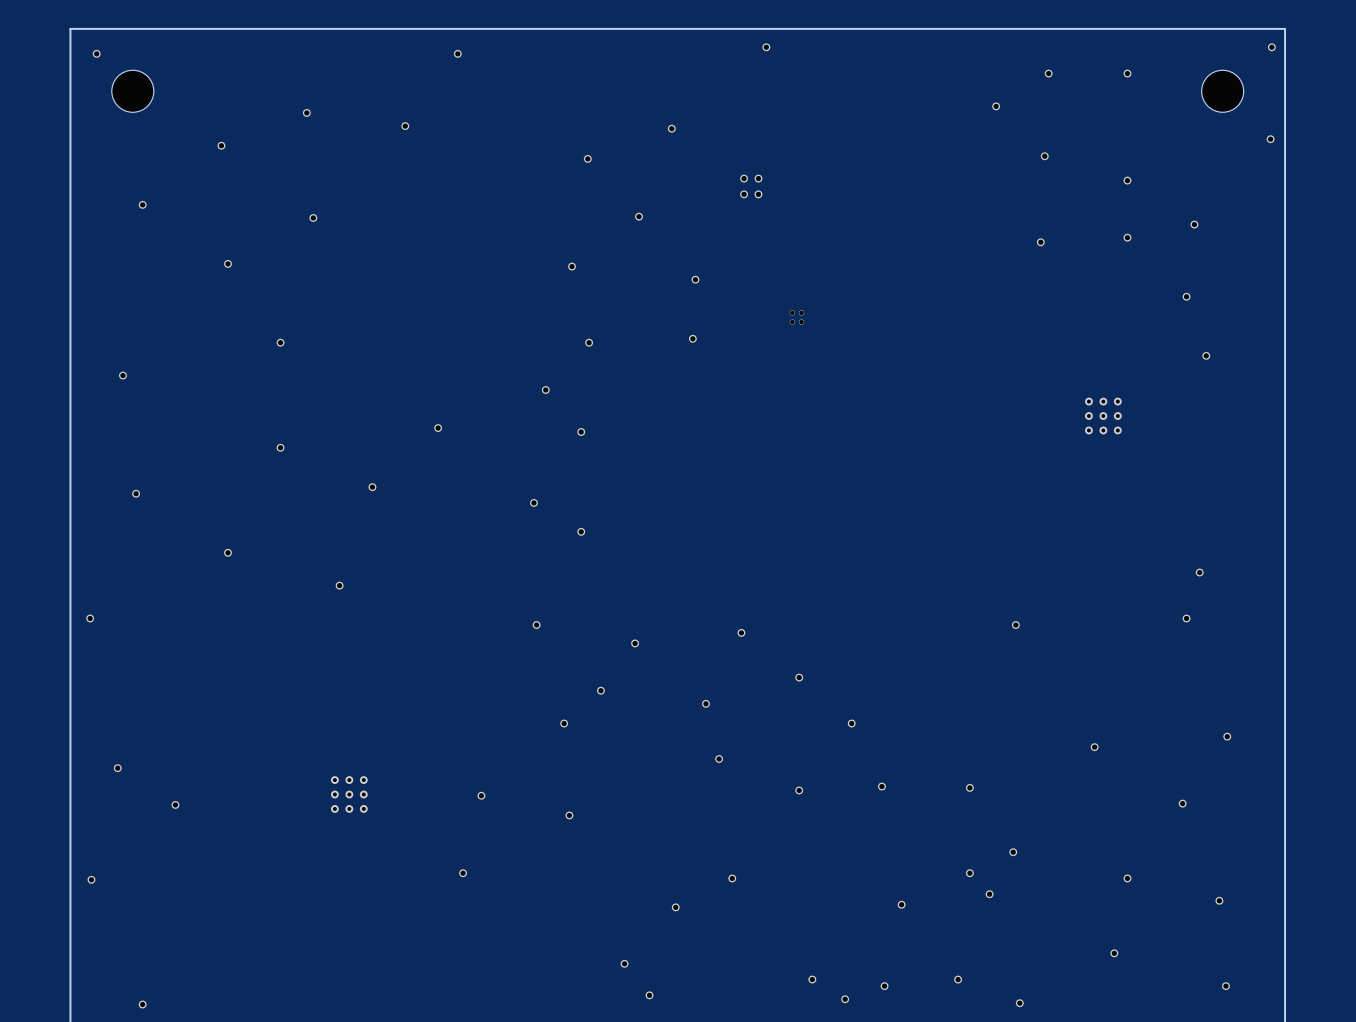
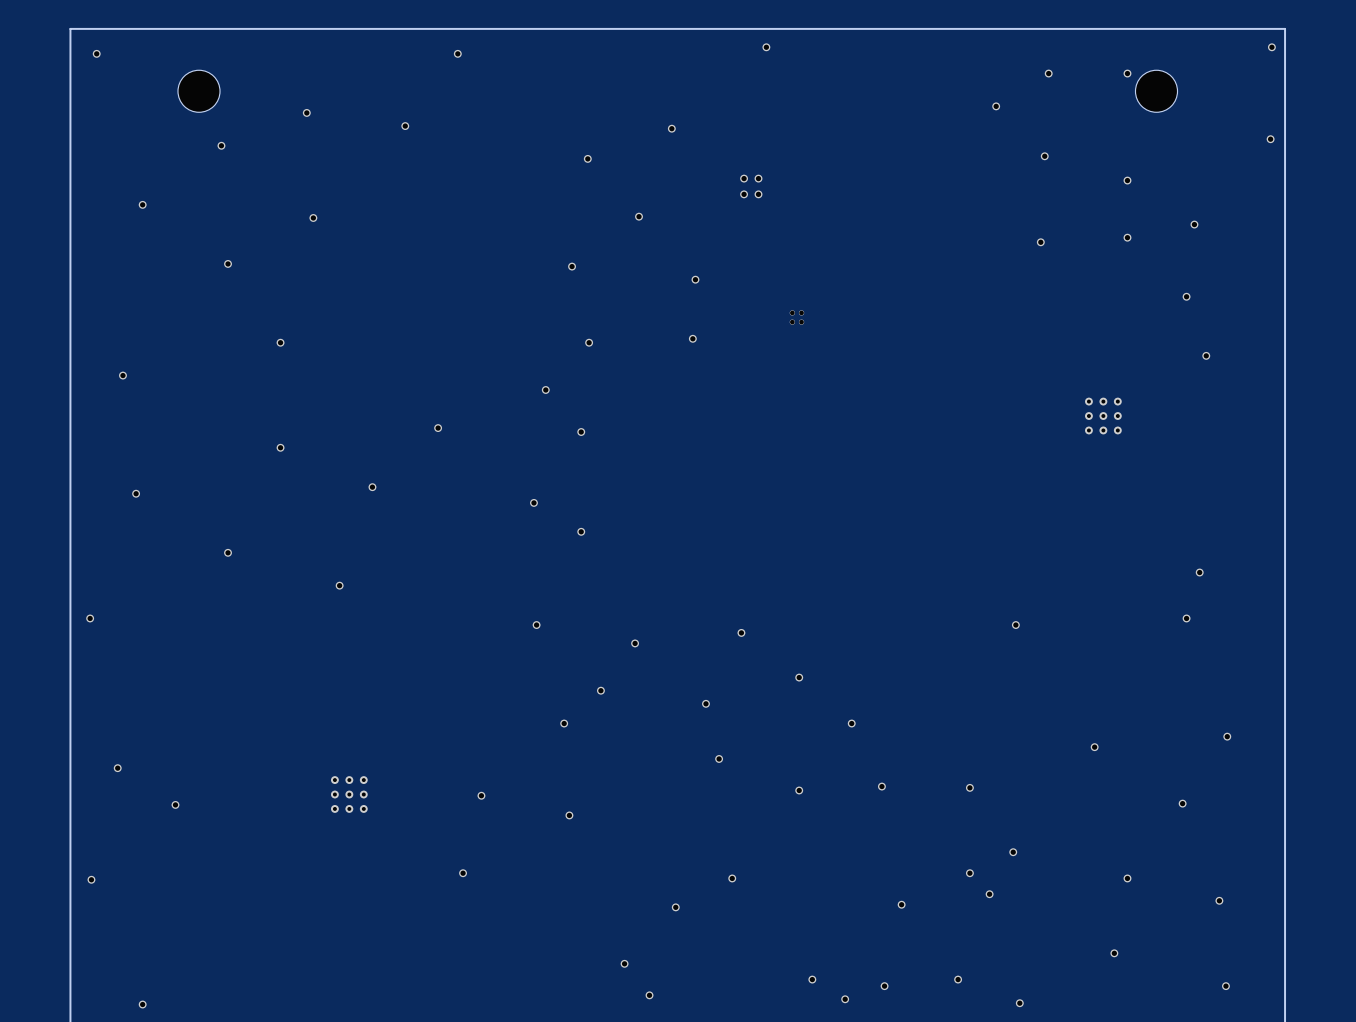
part position: (132, 91) -> (199, 91)
part position: (1222, 91) -> (1156, 91)

